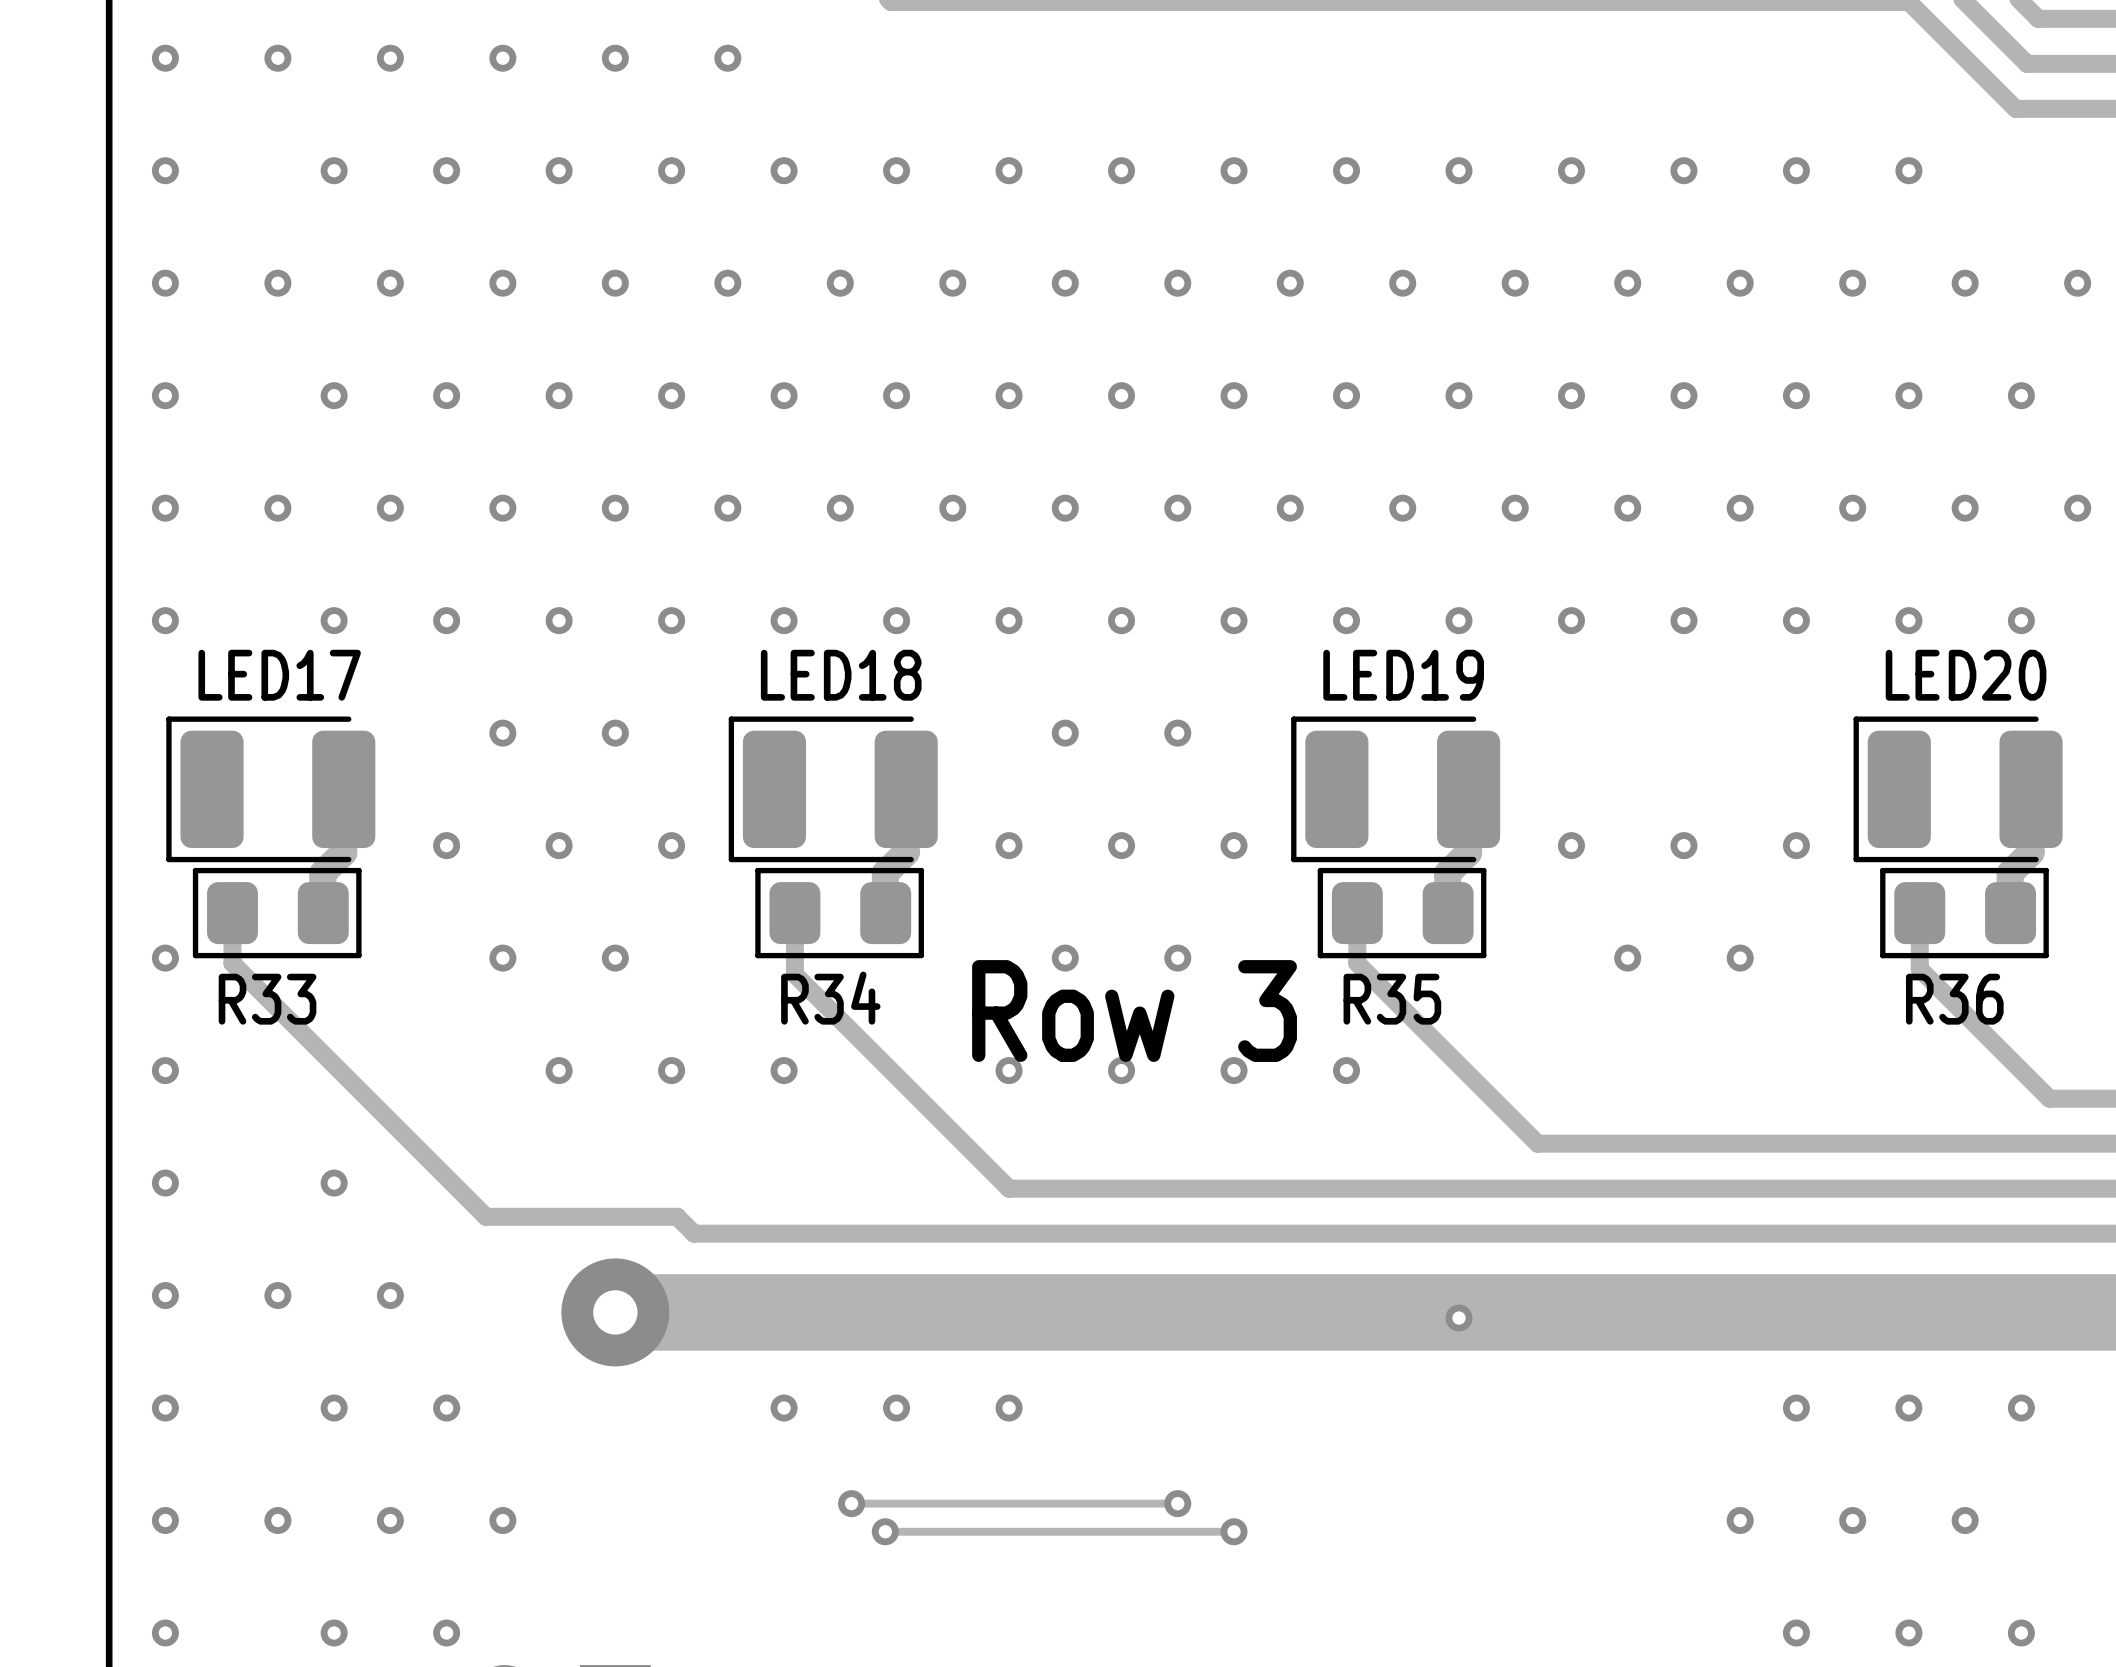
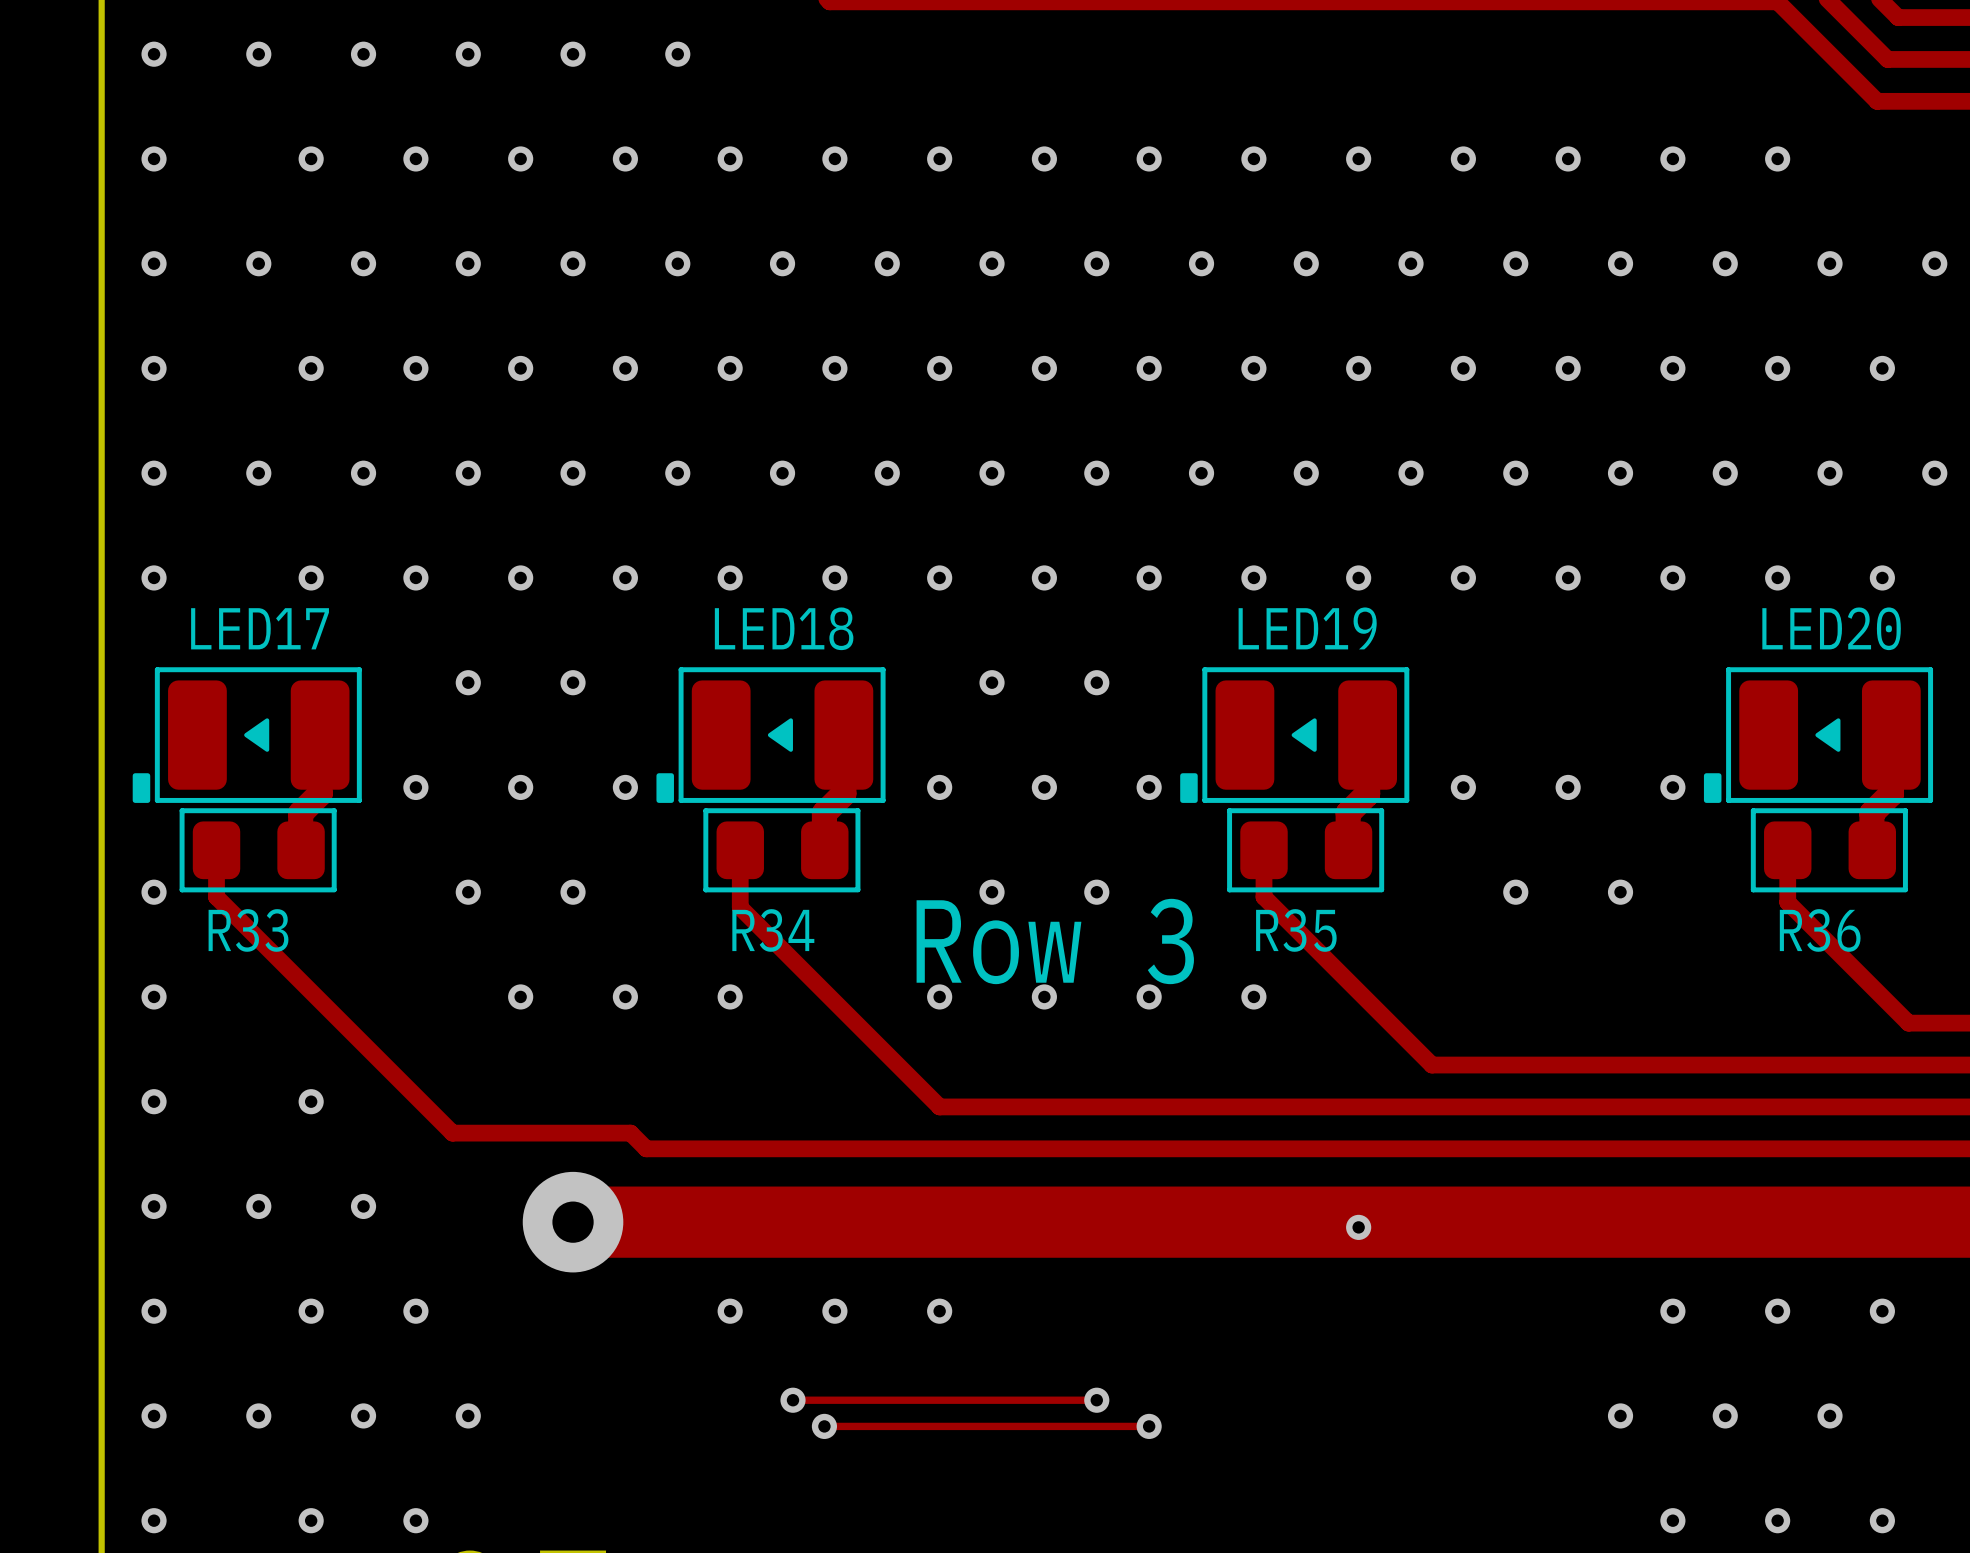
LED17 footprint: [166, 716, 376, 863] -> [132, 667, 362, 803]
LED18 footprint: [728, 716, 938, 863] -> [656, 667, 886, 803]
LED19 footprint: [1291, 716, 1501, 863] -> [1180, 667, 1410, 803]
LED20 footprint: [1853, 716, 2063, 863] -> [1703, 667, 1934, 803]

